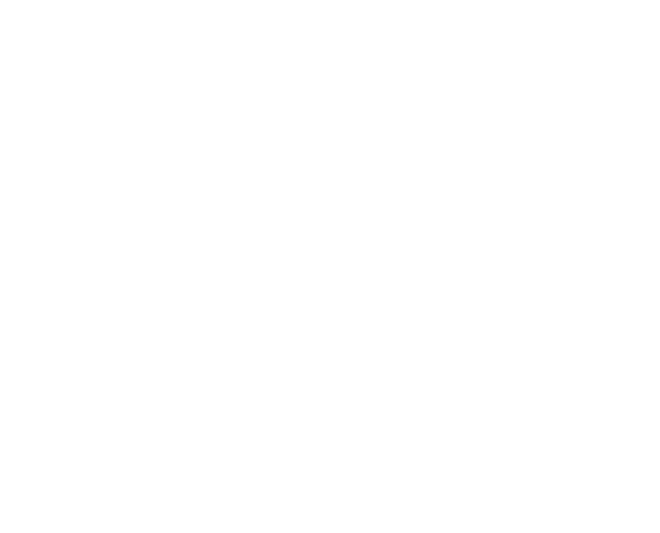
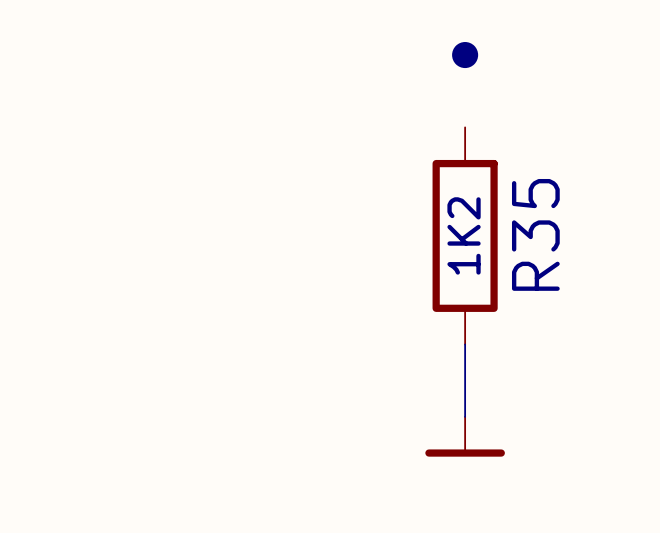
junction: none -> (465, 55)
R35: none -> 1K2 (465, 235)
wire: none -> (465, 344) (465, 416)
power symbol: none -> (465, 436)

